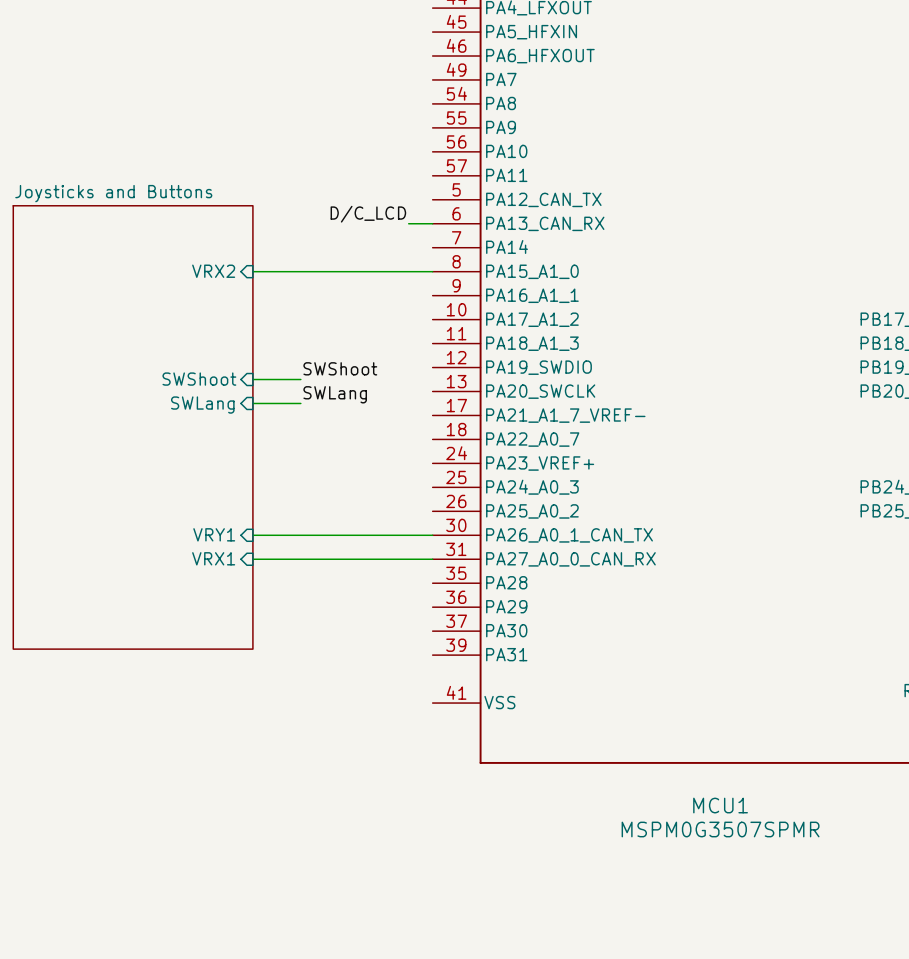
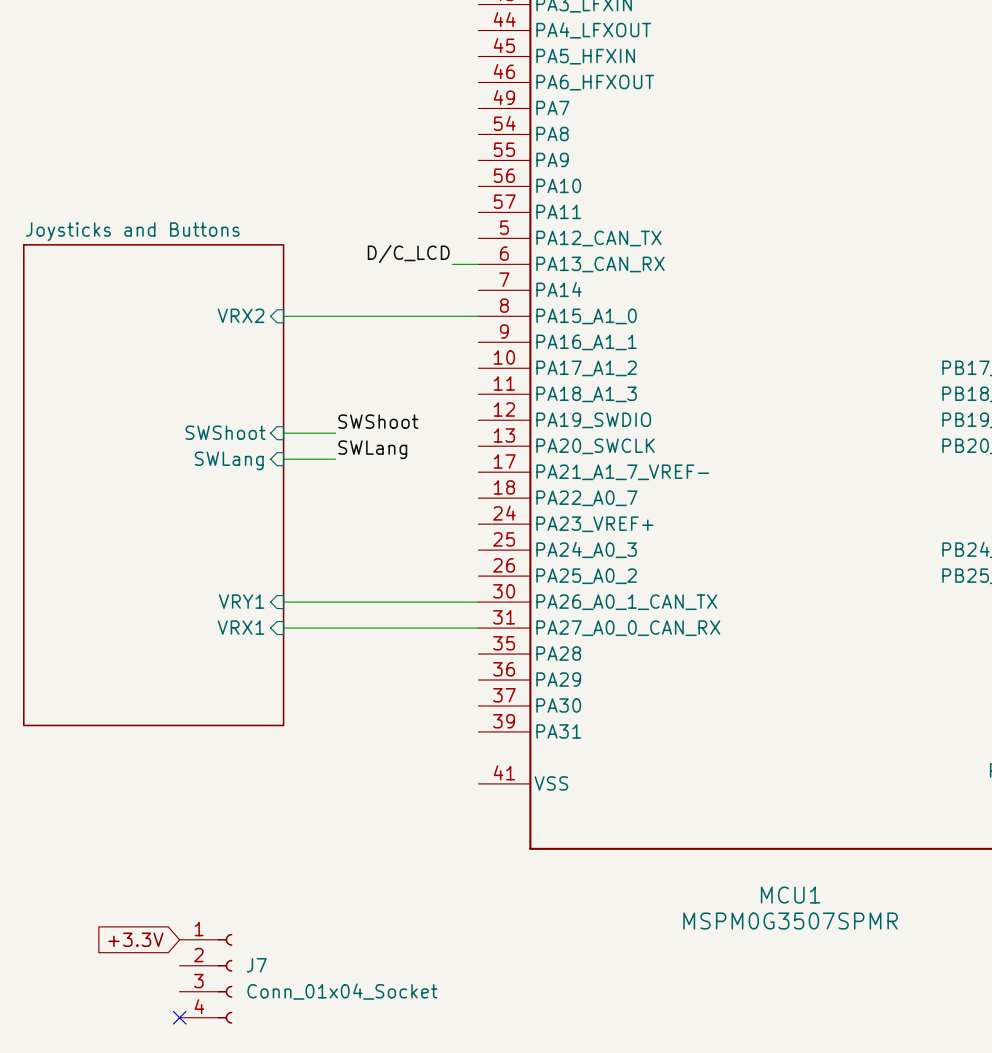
global label: none -> +3.3V (135, 939)
J7: none -> Conn_01x04_Socket (206, 978)
no-connect mark: none -> (179, 1017)

